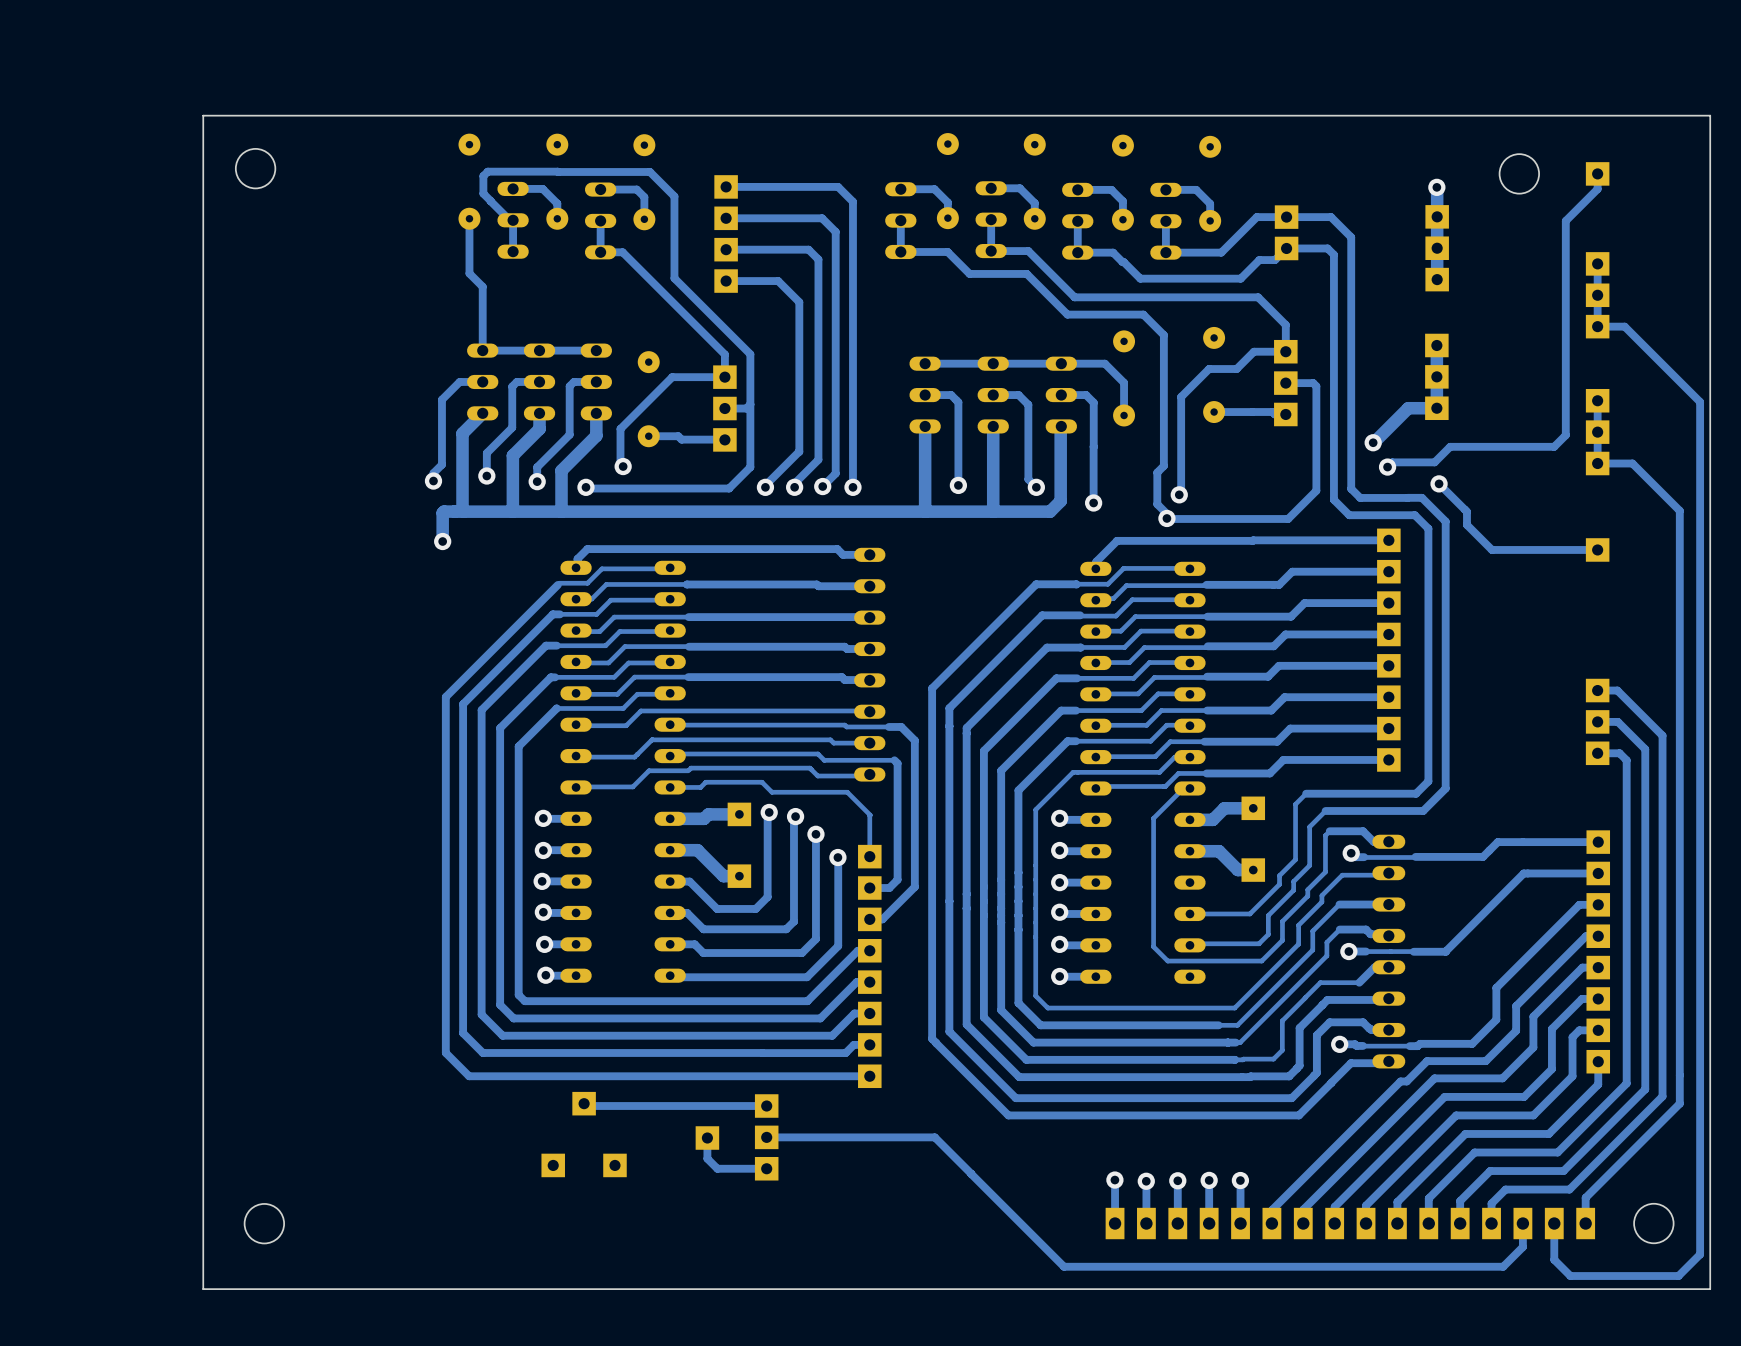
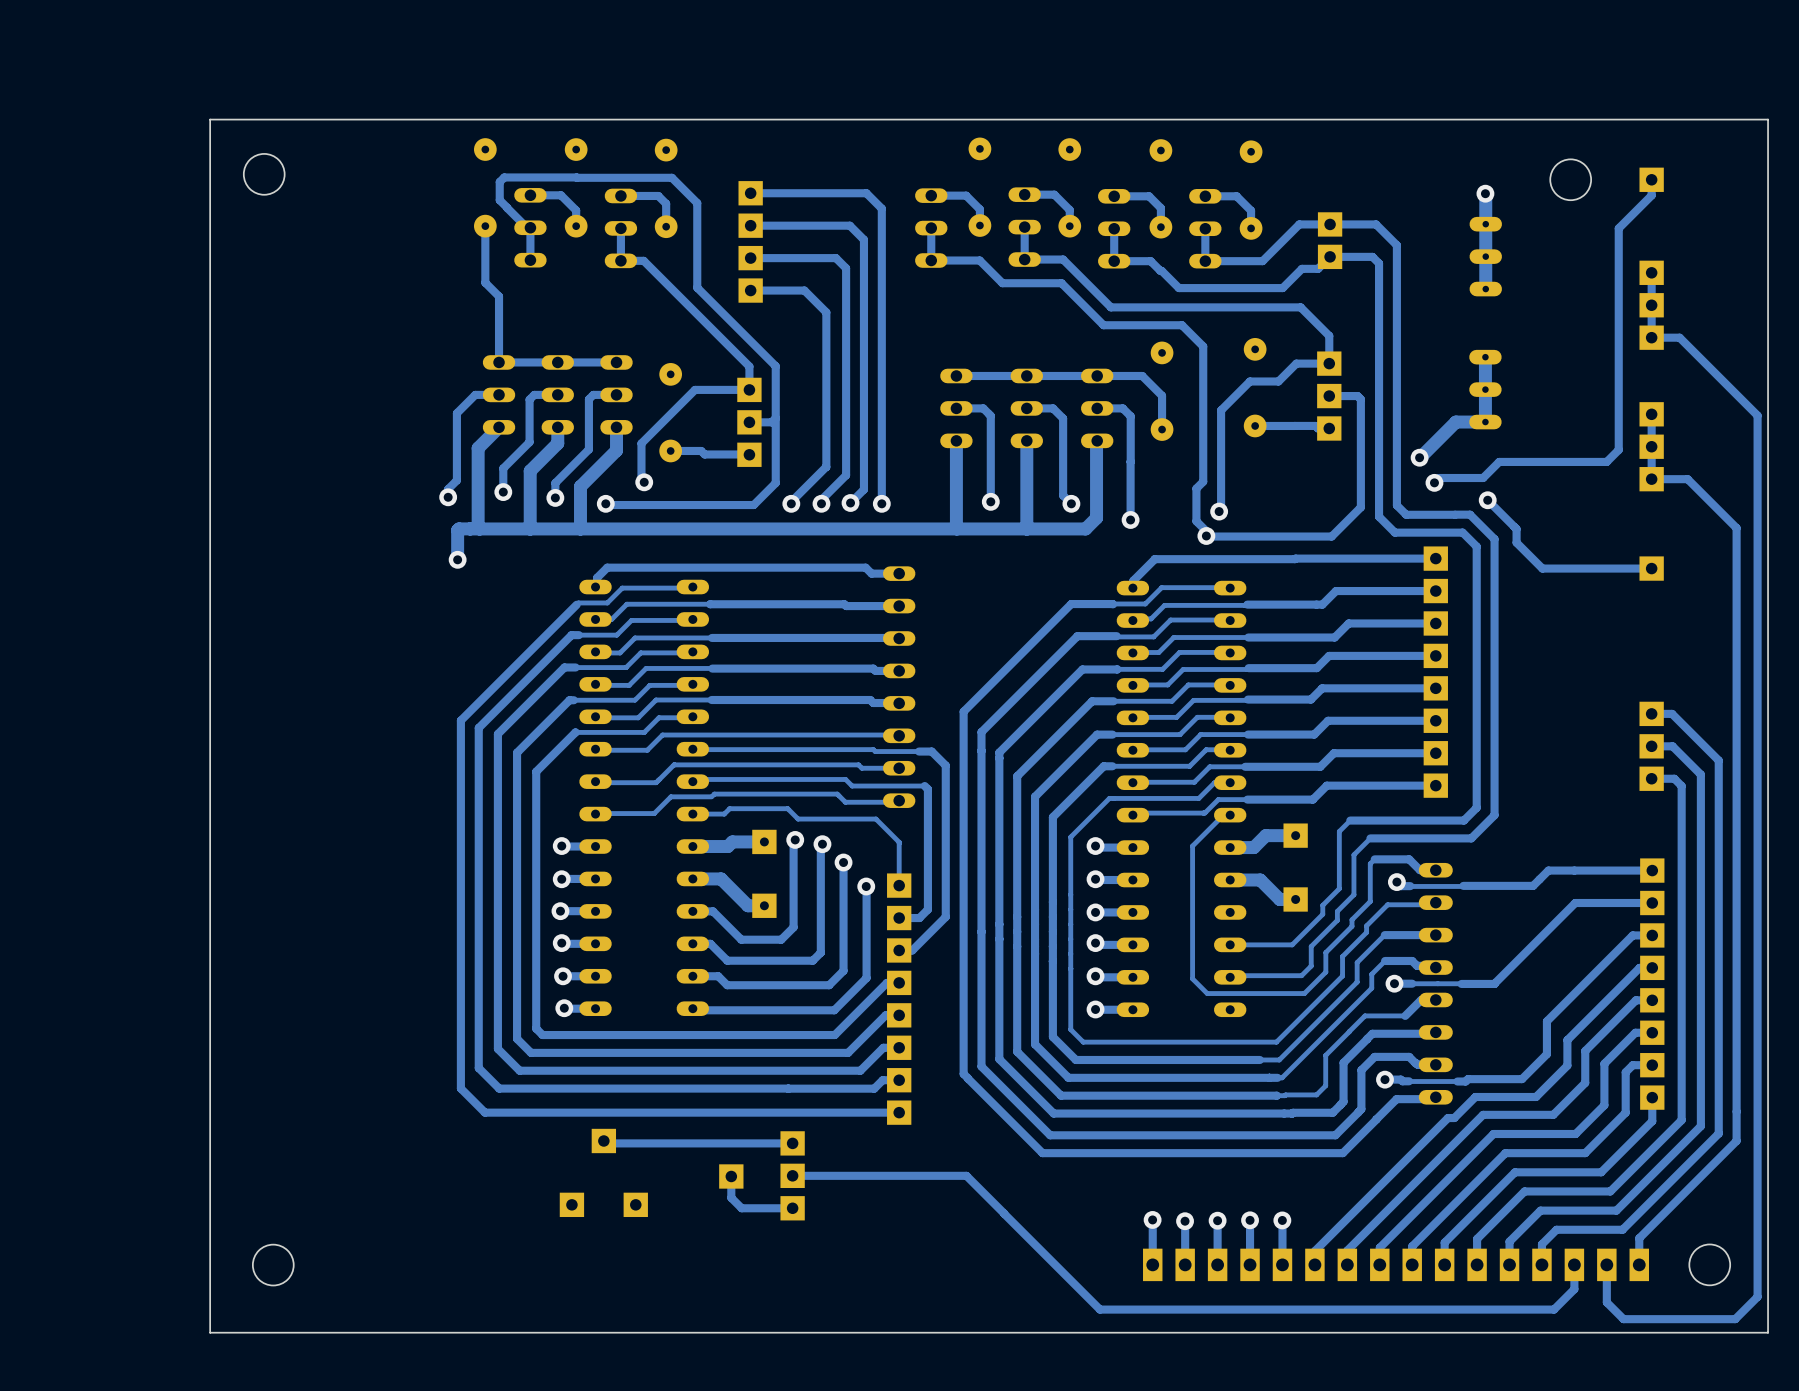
part footprint: [1425, 205, 1449, 292] -> [1469, 216, 1502, 297]
part footprint: [1425, 333, 1449, 421] -> [1469, 349, 1502, 430]

